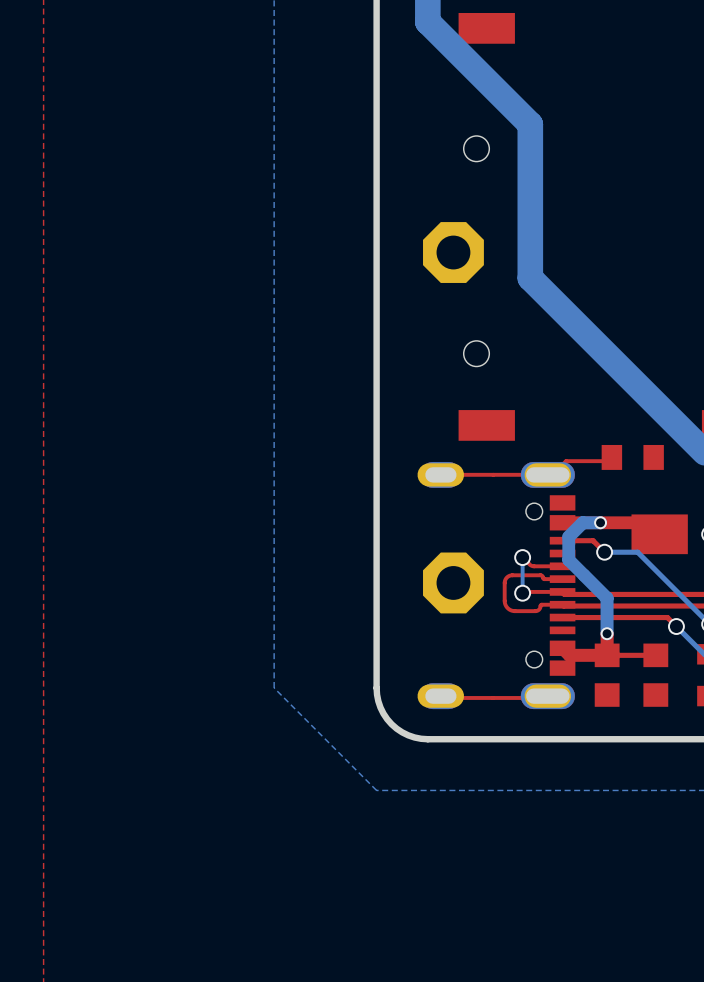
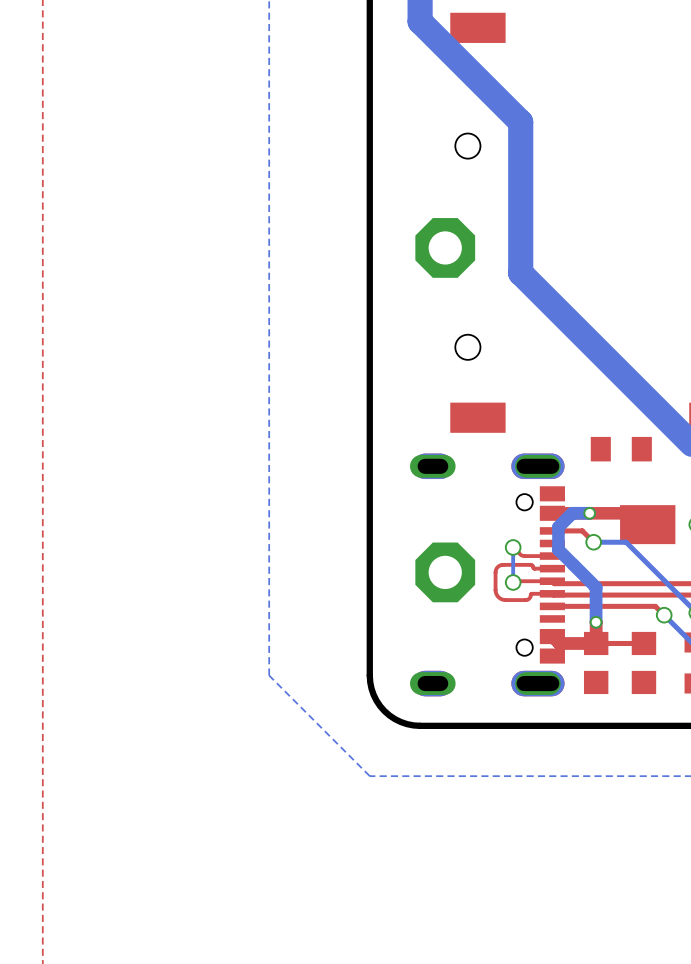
top track: (611, 461) (566, 461) (552, 474) -> none
top track: (547, 474) (443, 474) -> none
top track: (440, 696) (443, 697) (547, 697) -> none

